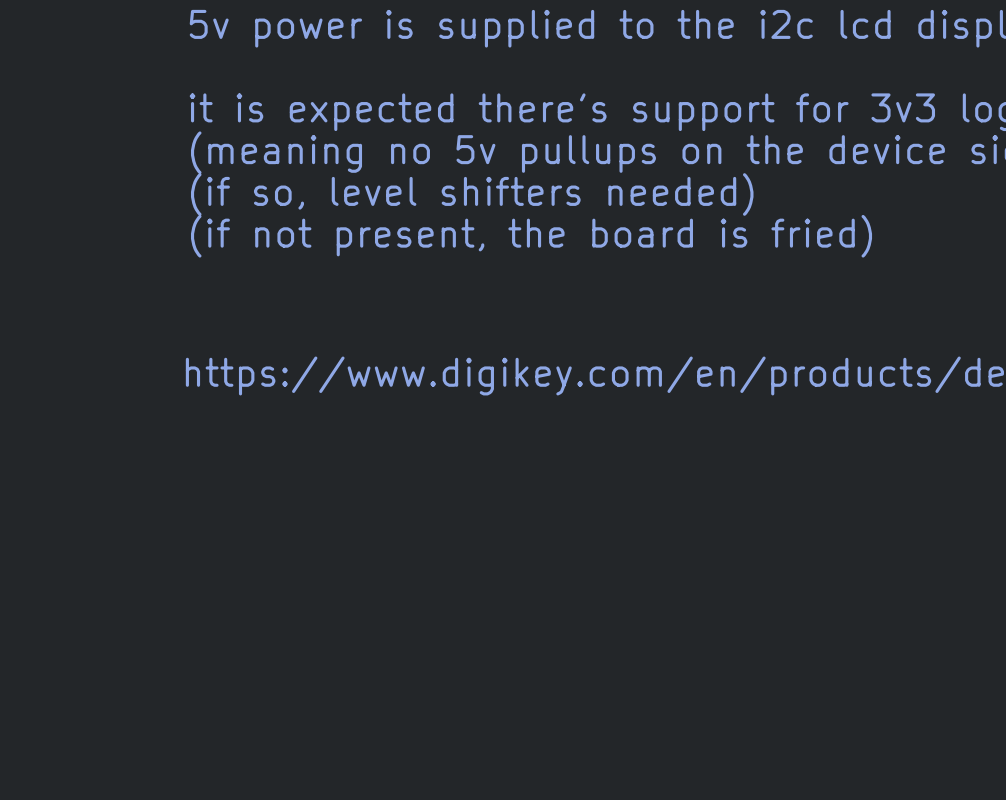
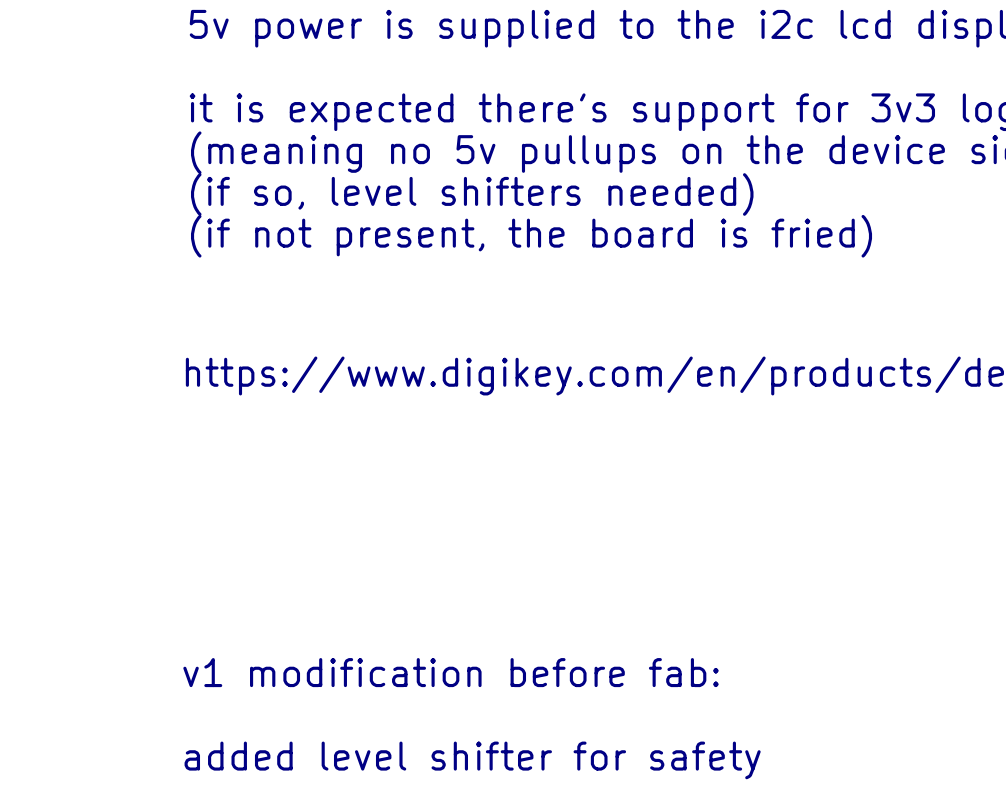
text: none -> v1 modification before fab: (451, 672)
text: none -> added level shifter for safety (472, 760)

